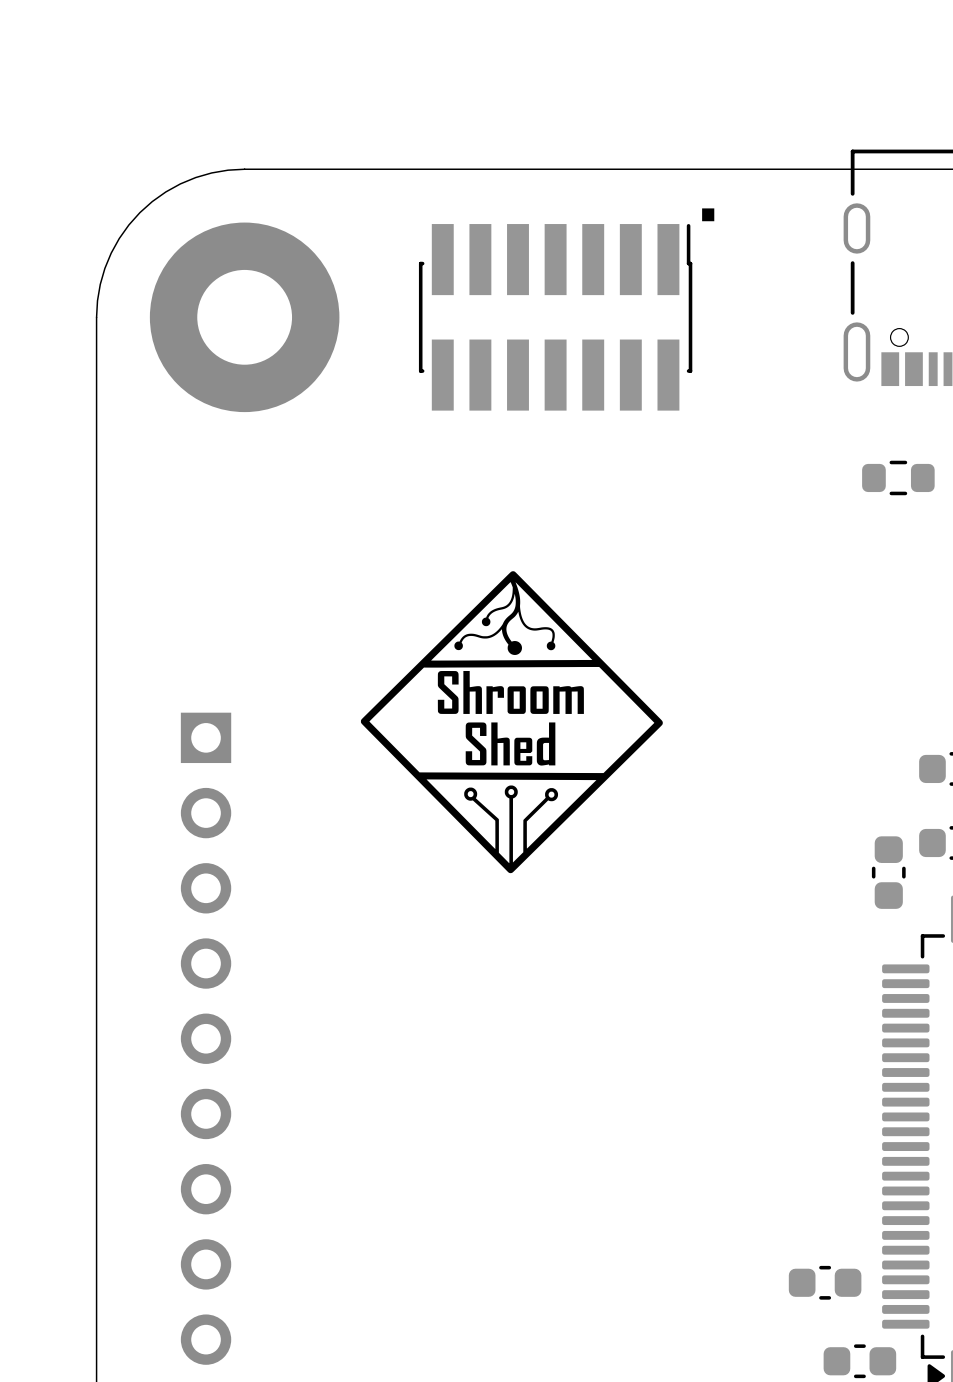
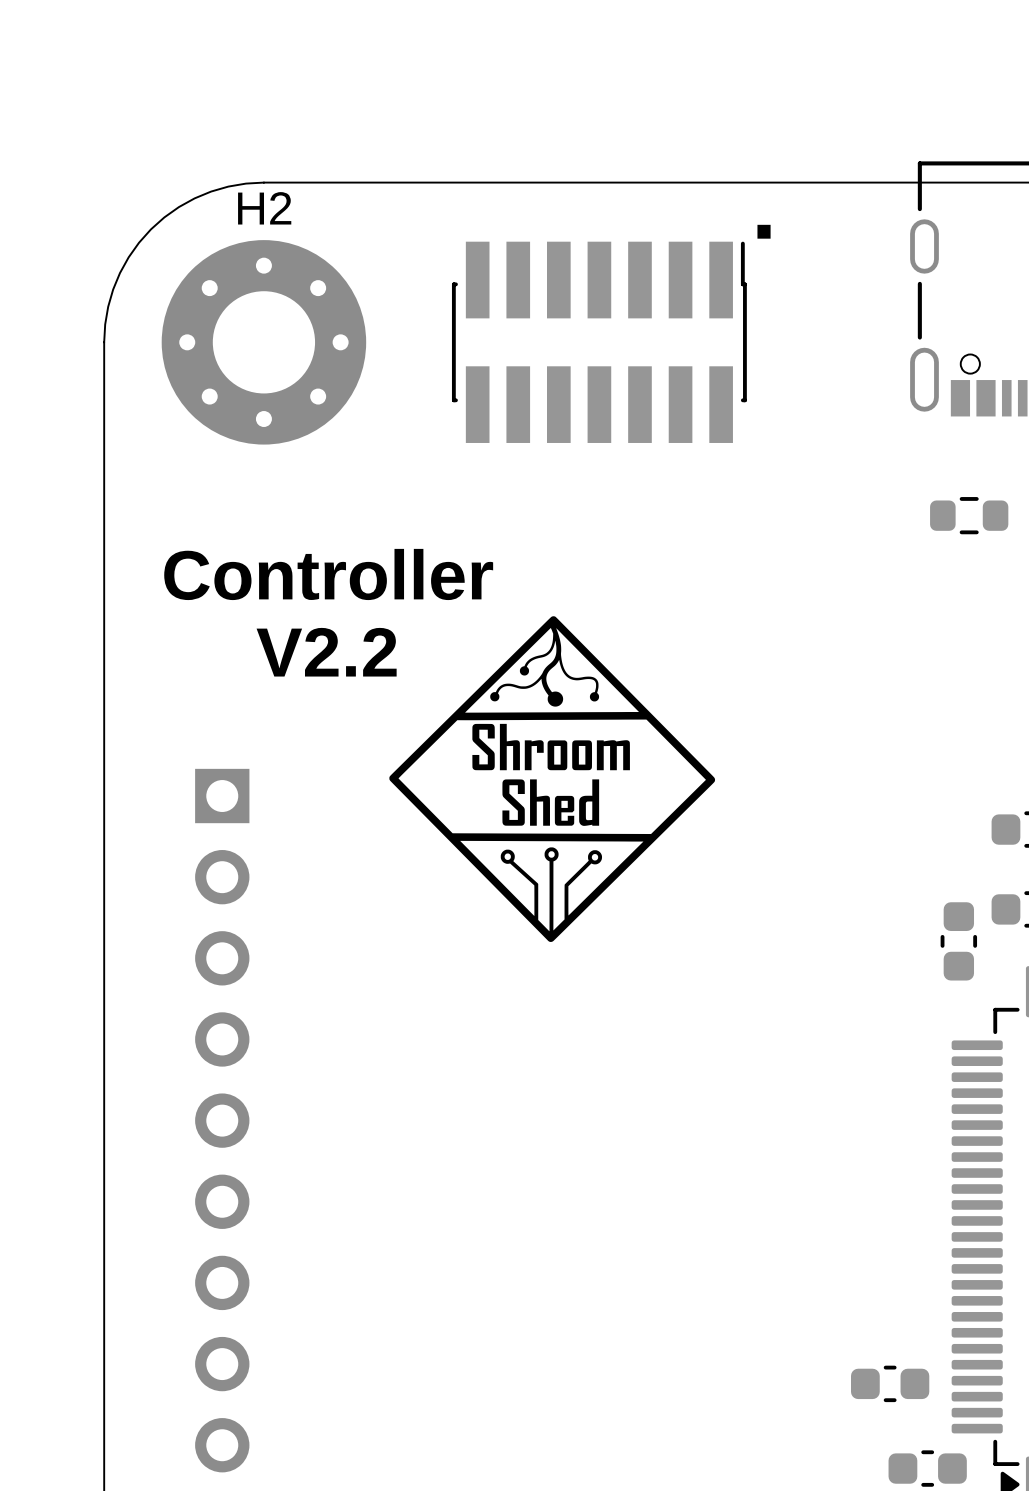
part: (244, 317) -> none
H2: none -> (263, 342)
text: none -> Controller (328, 574)
text: none -> V2.2 (326, 652)

